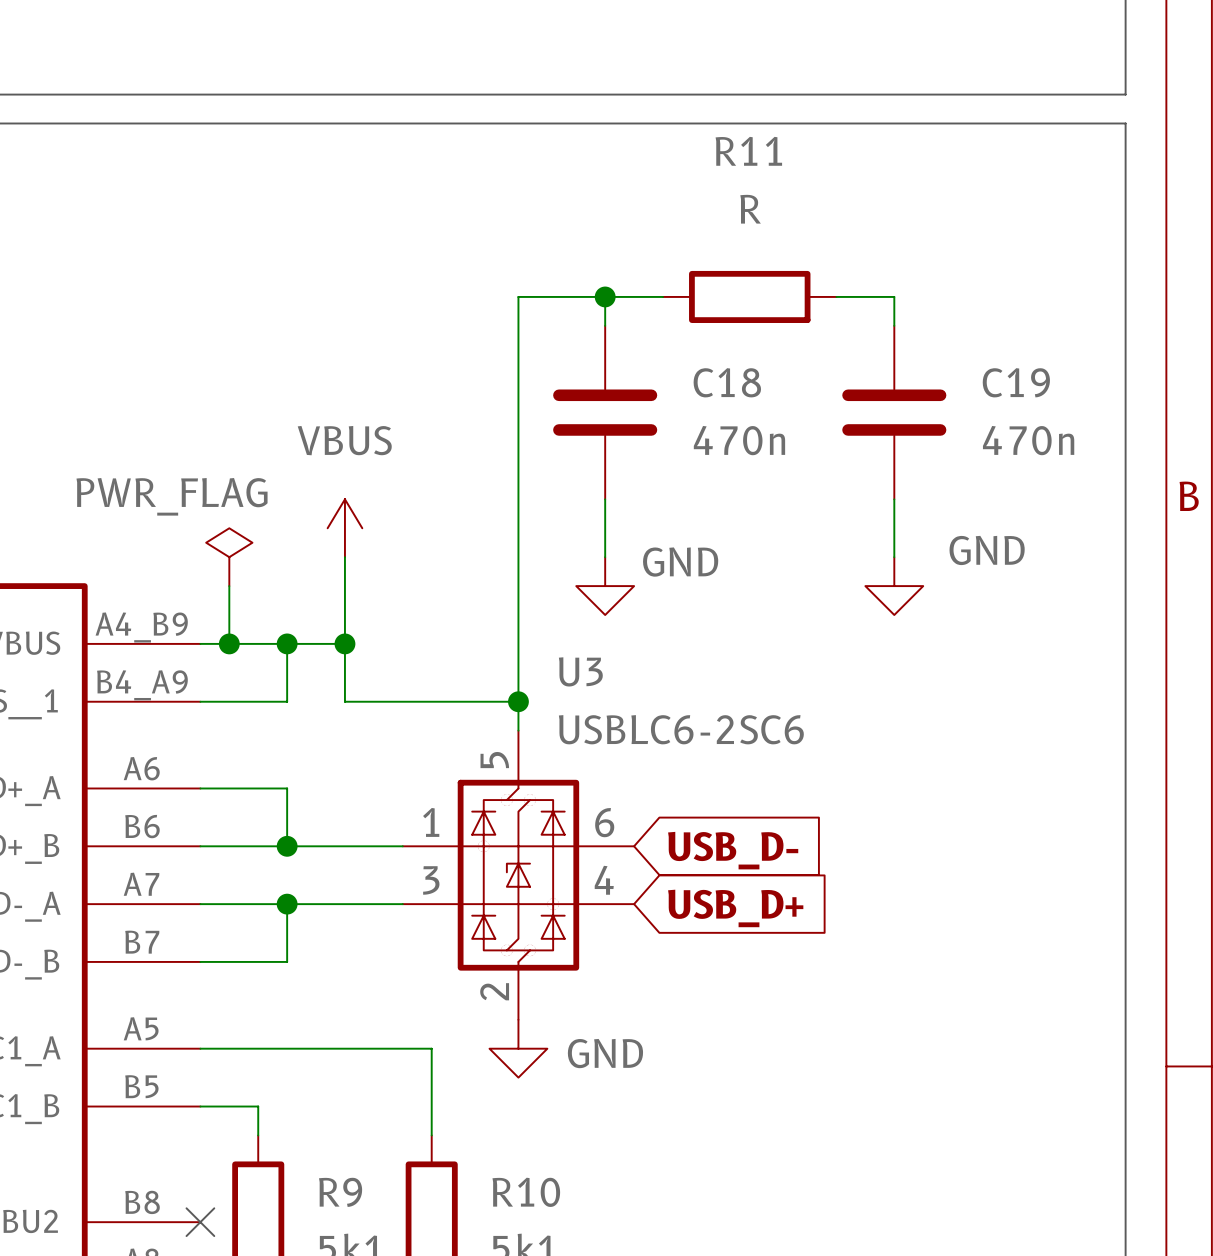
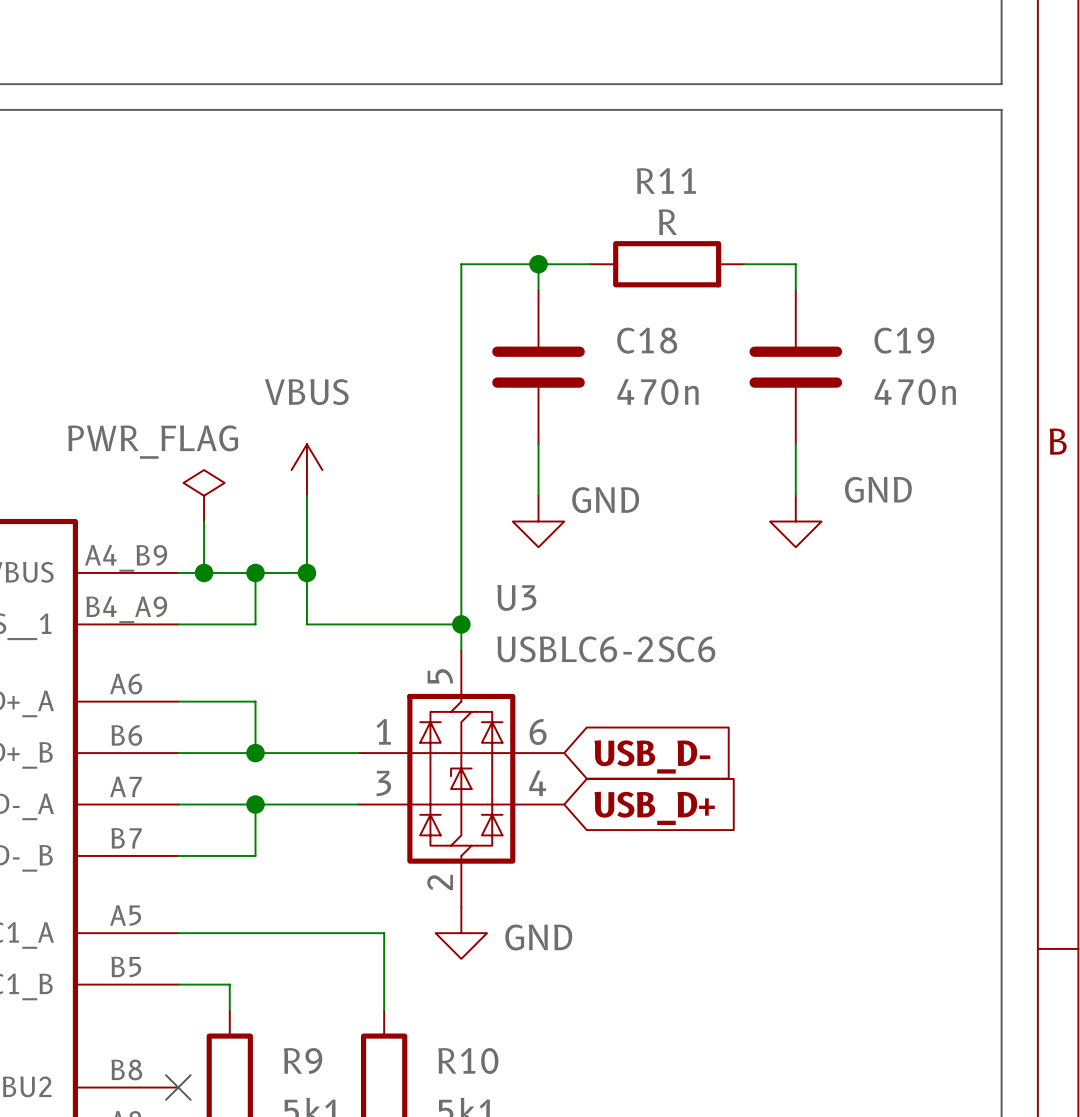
R11 name position: R11 (748, 151) -> R11 (666, 180)
R11 value position: R (750, 209) -> R (667, 222)

